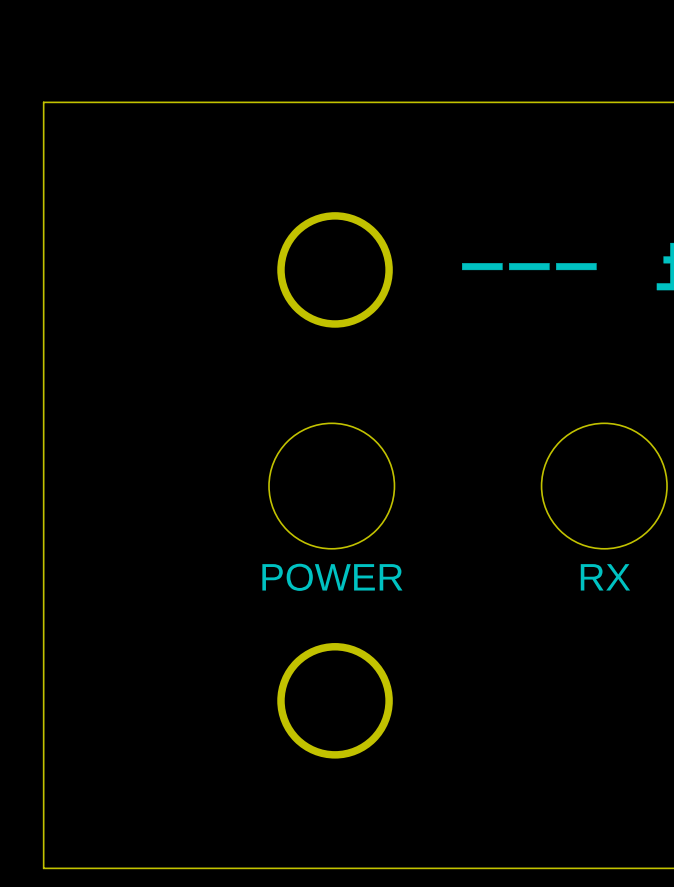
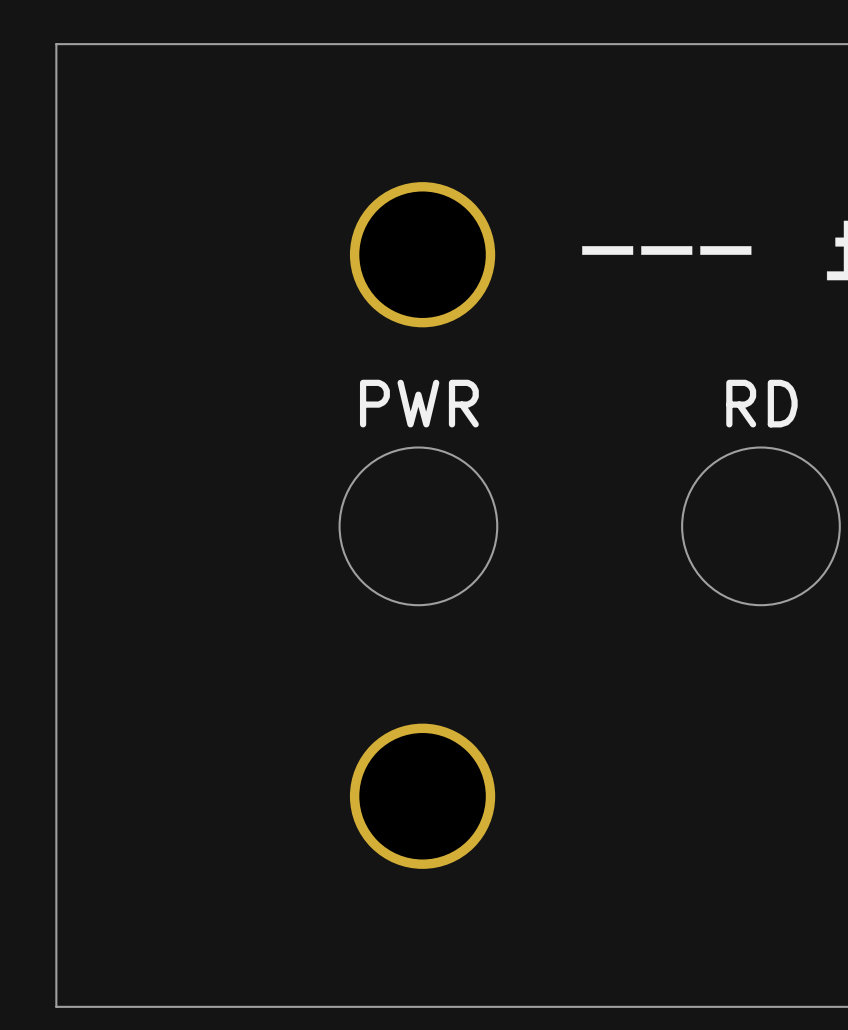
text: none -> PWR (419, 403)
text: none -> RD (761, 403)
text: POWER (332, 577) -> none
text: RX (605, 577) -> none

